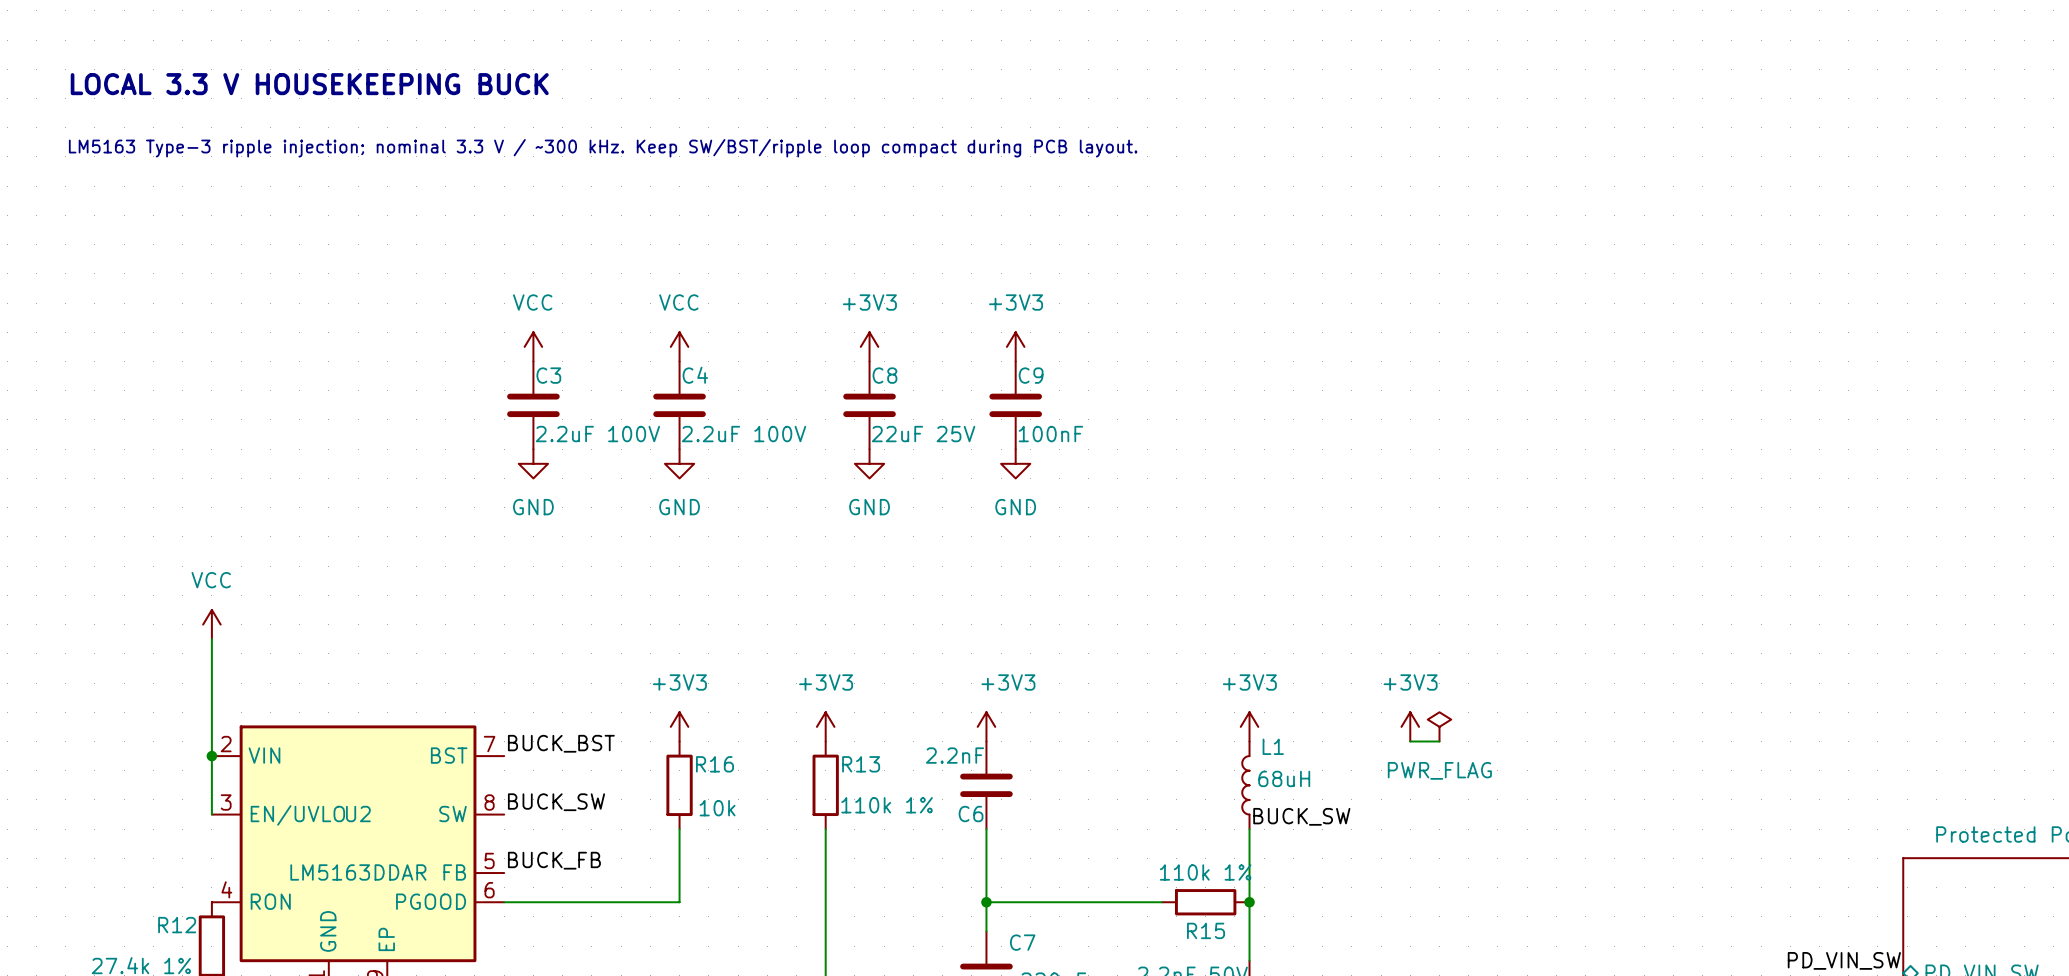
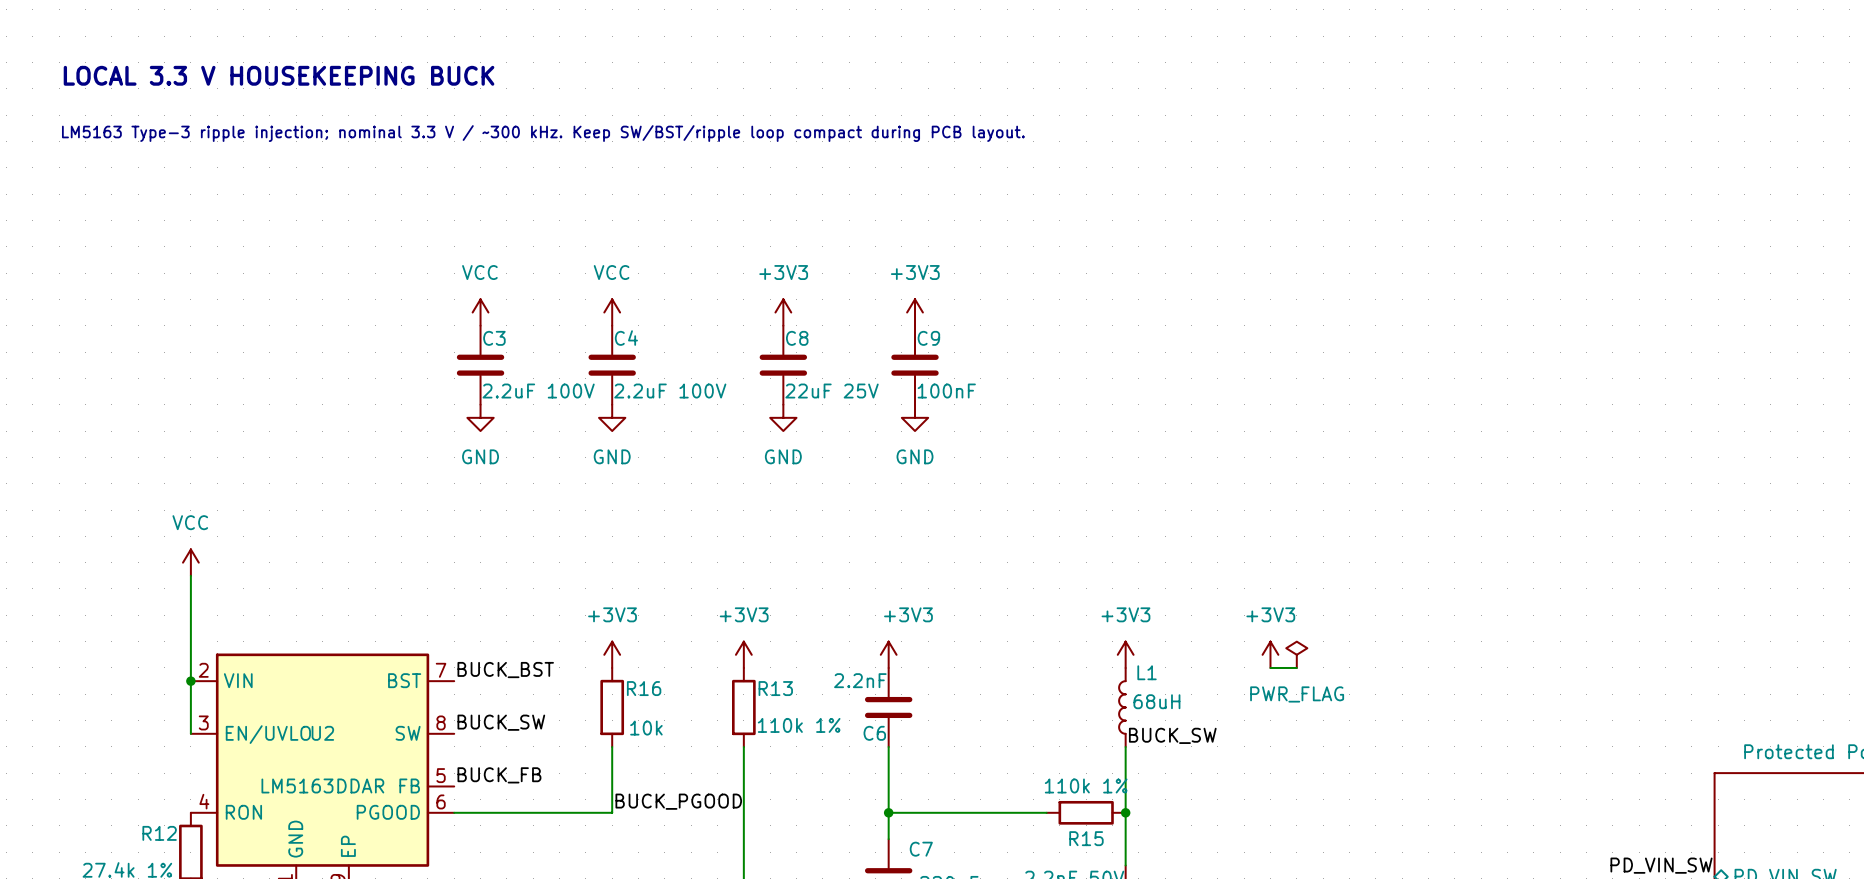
label: none -> BUCK_PGOOD (678, 801)

